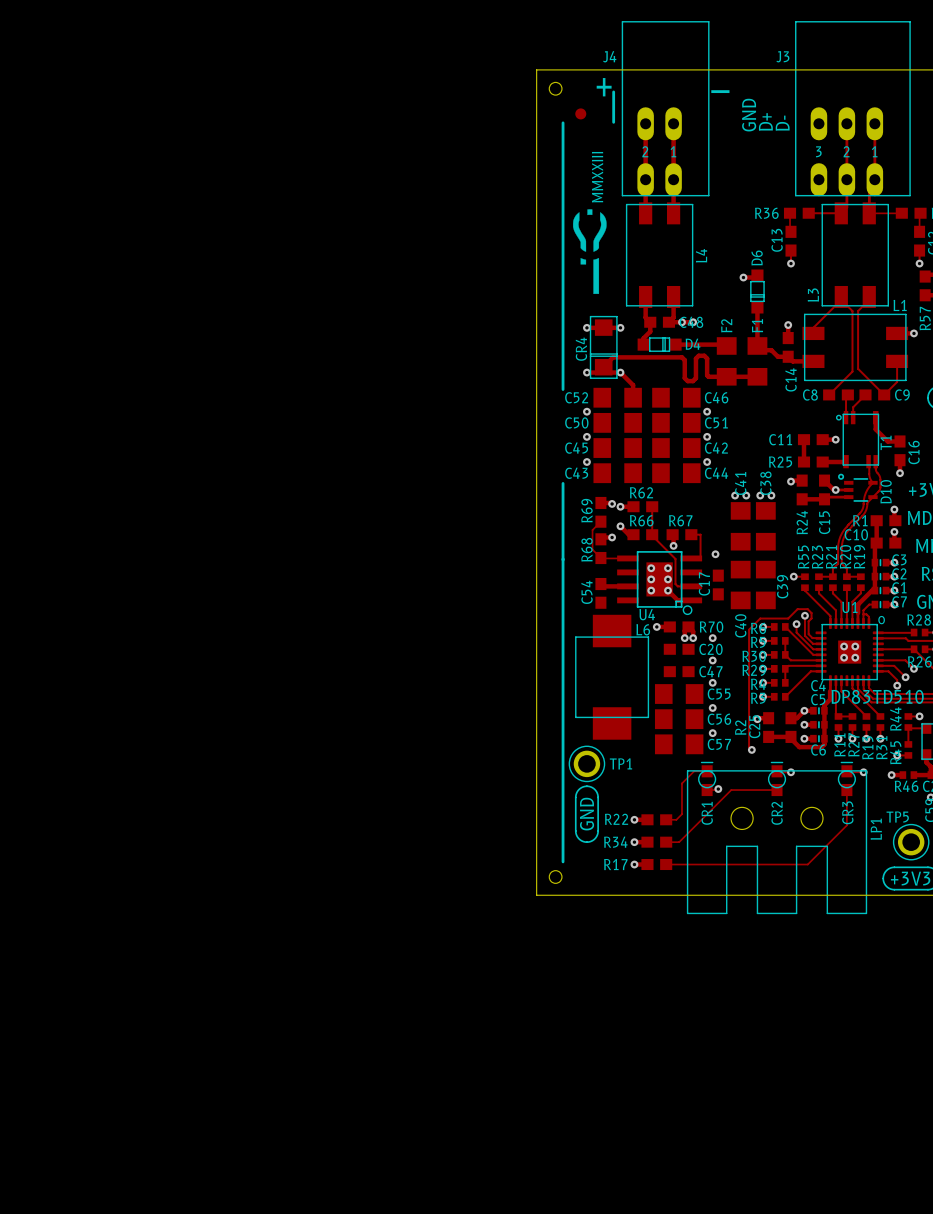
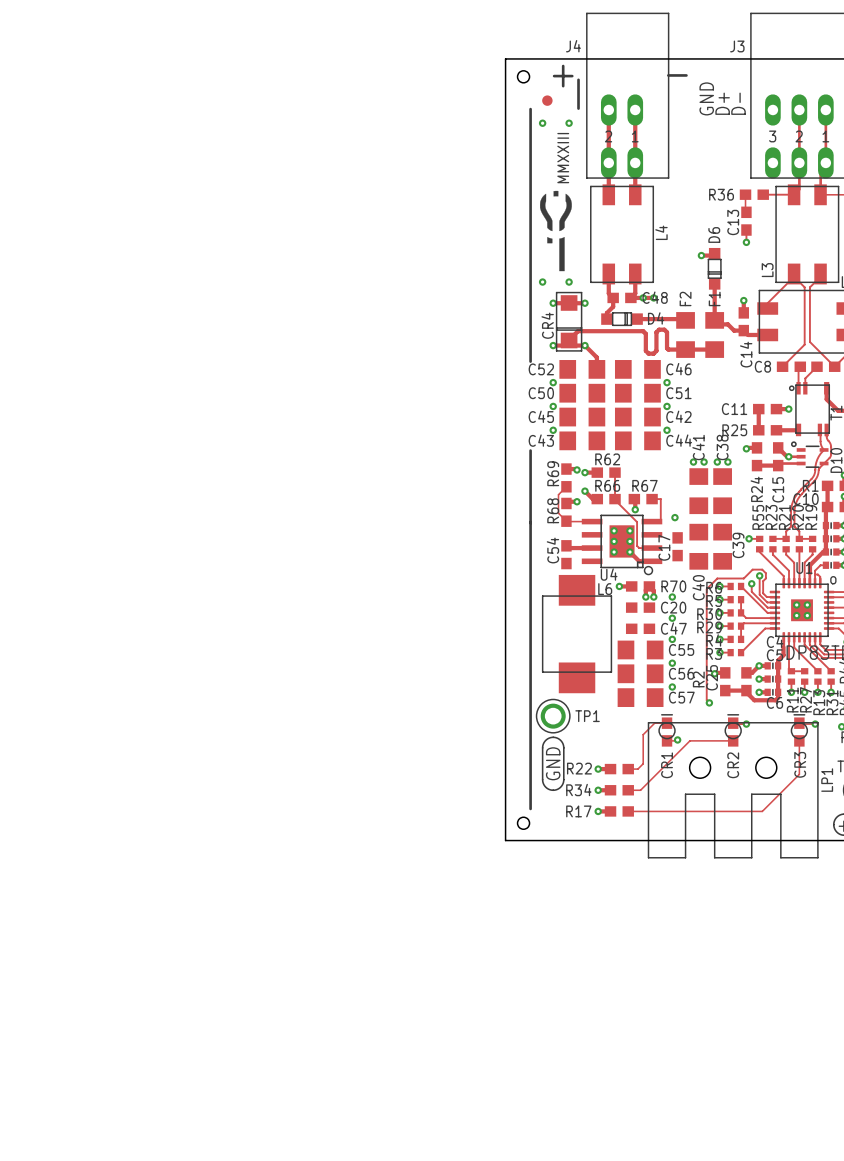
via: none -> (542, 123)
via: none -> (569, 123)
via: none -> (542, 282)
via: none -> (569, 282)

